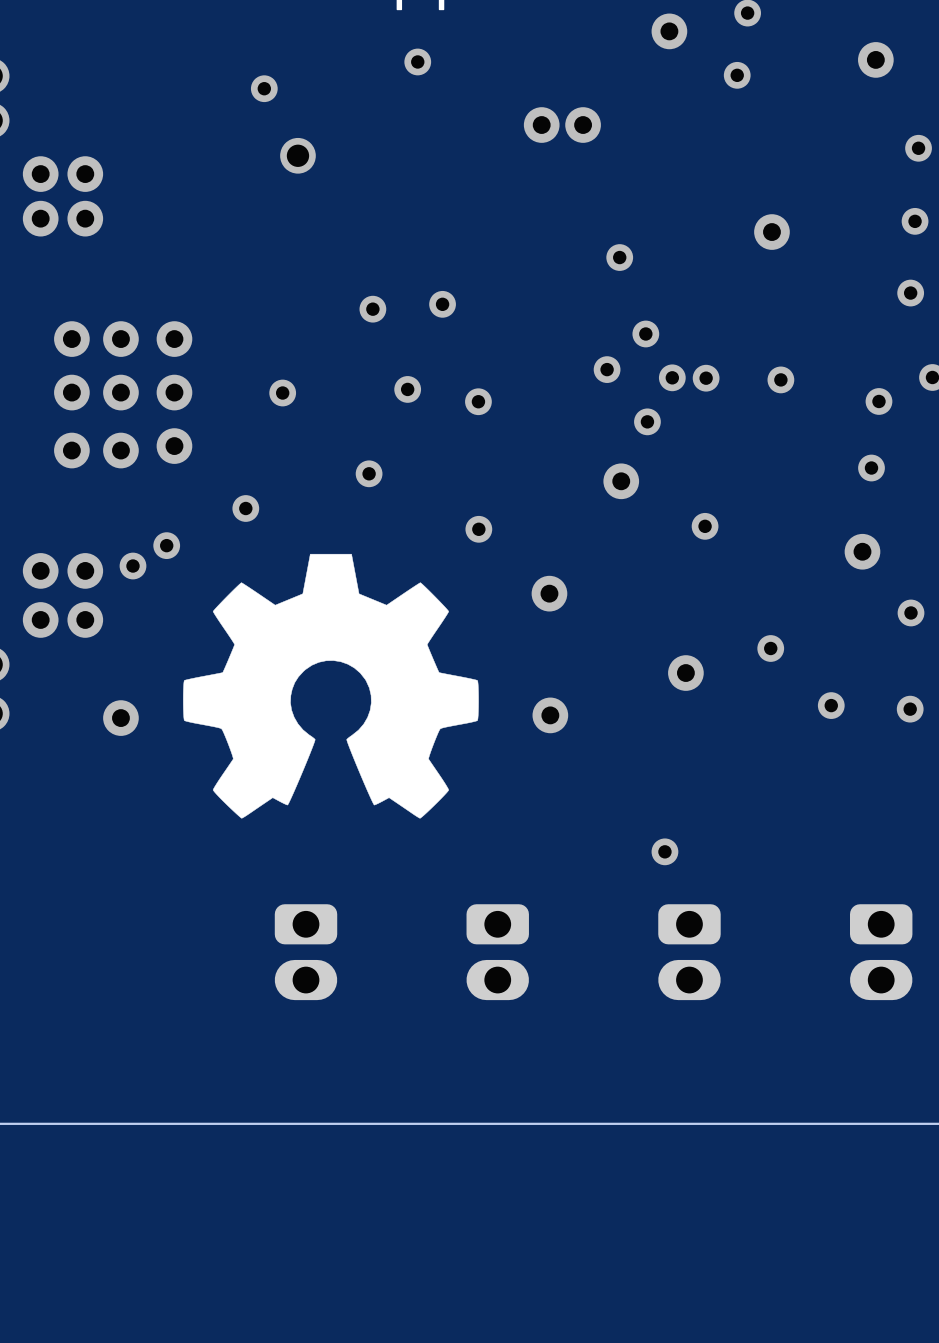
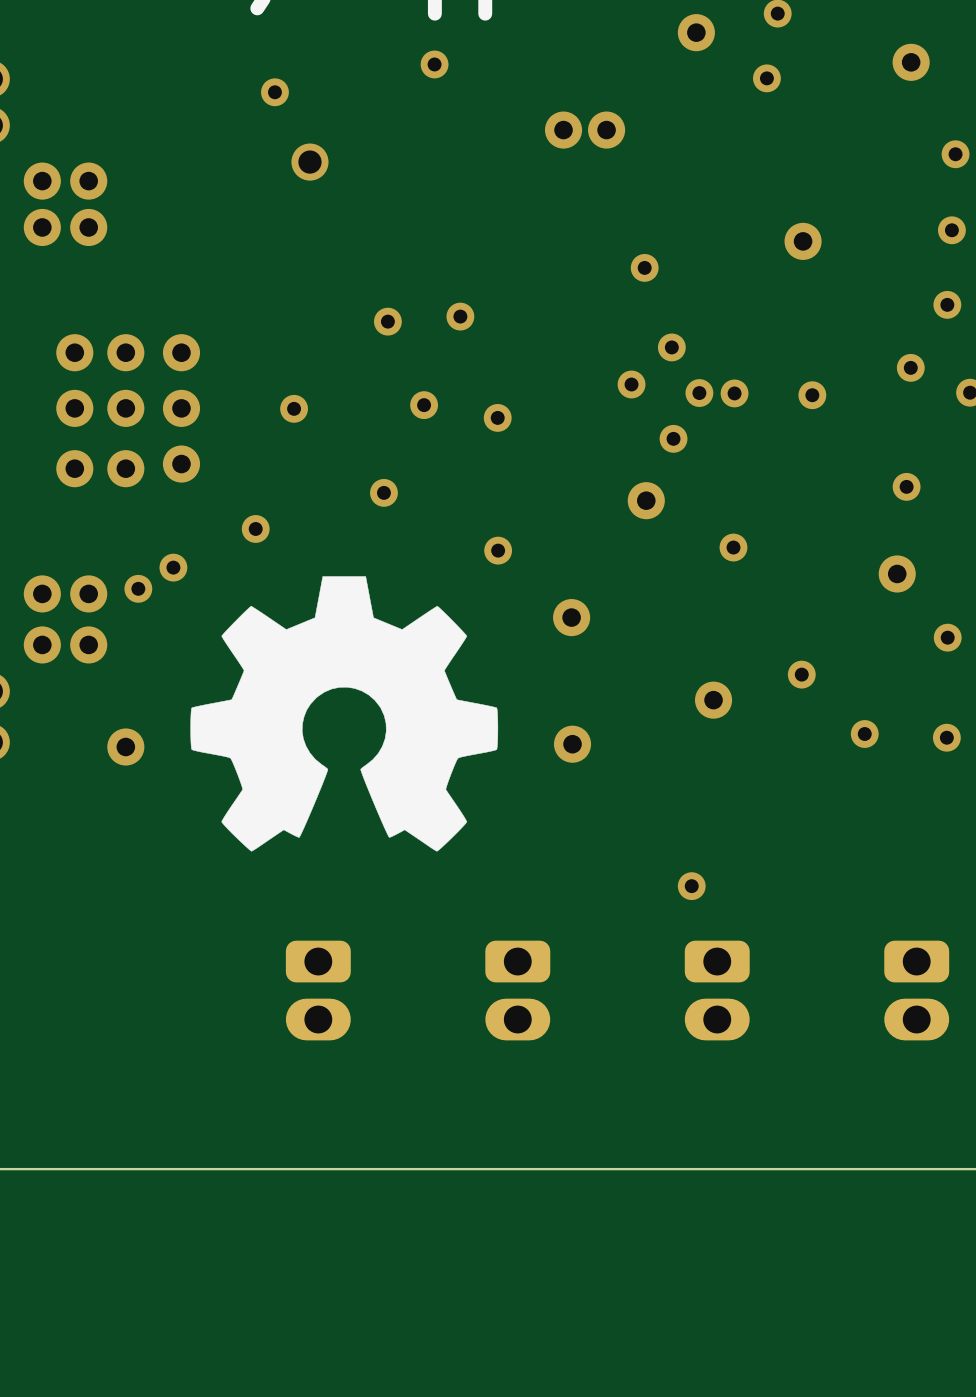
via position: (878, 401) -> (910, 367)

